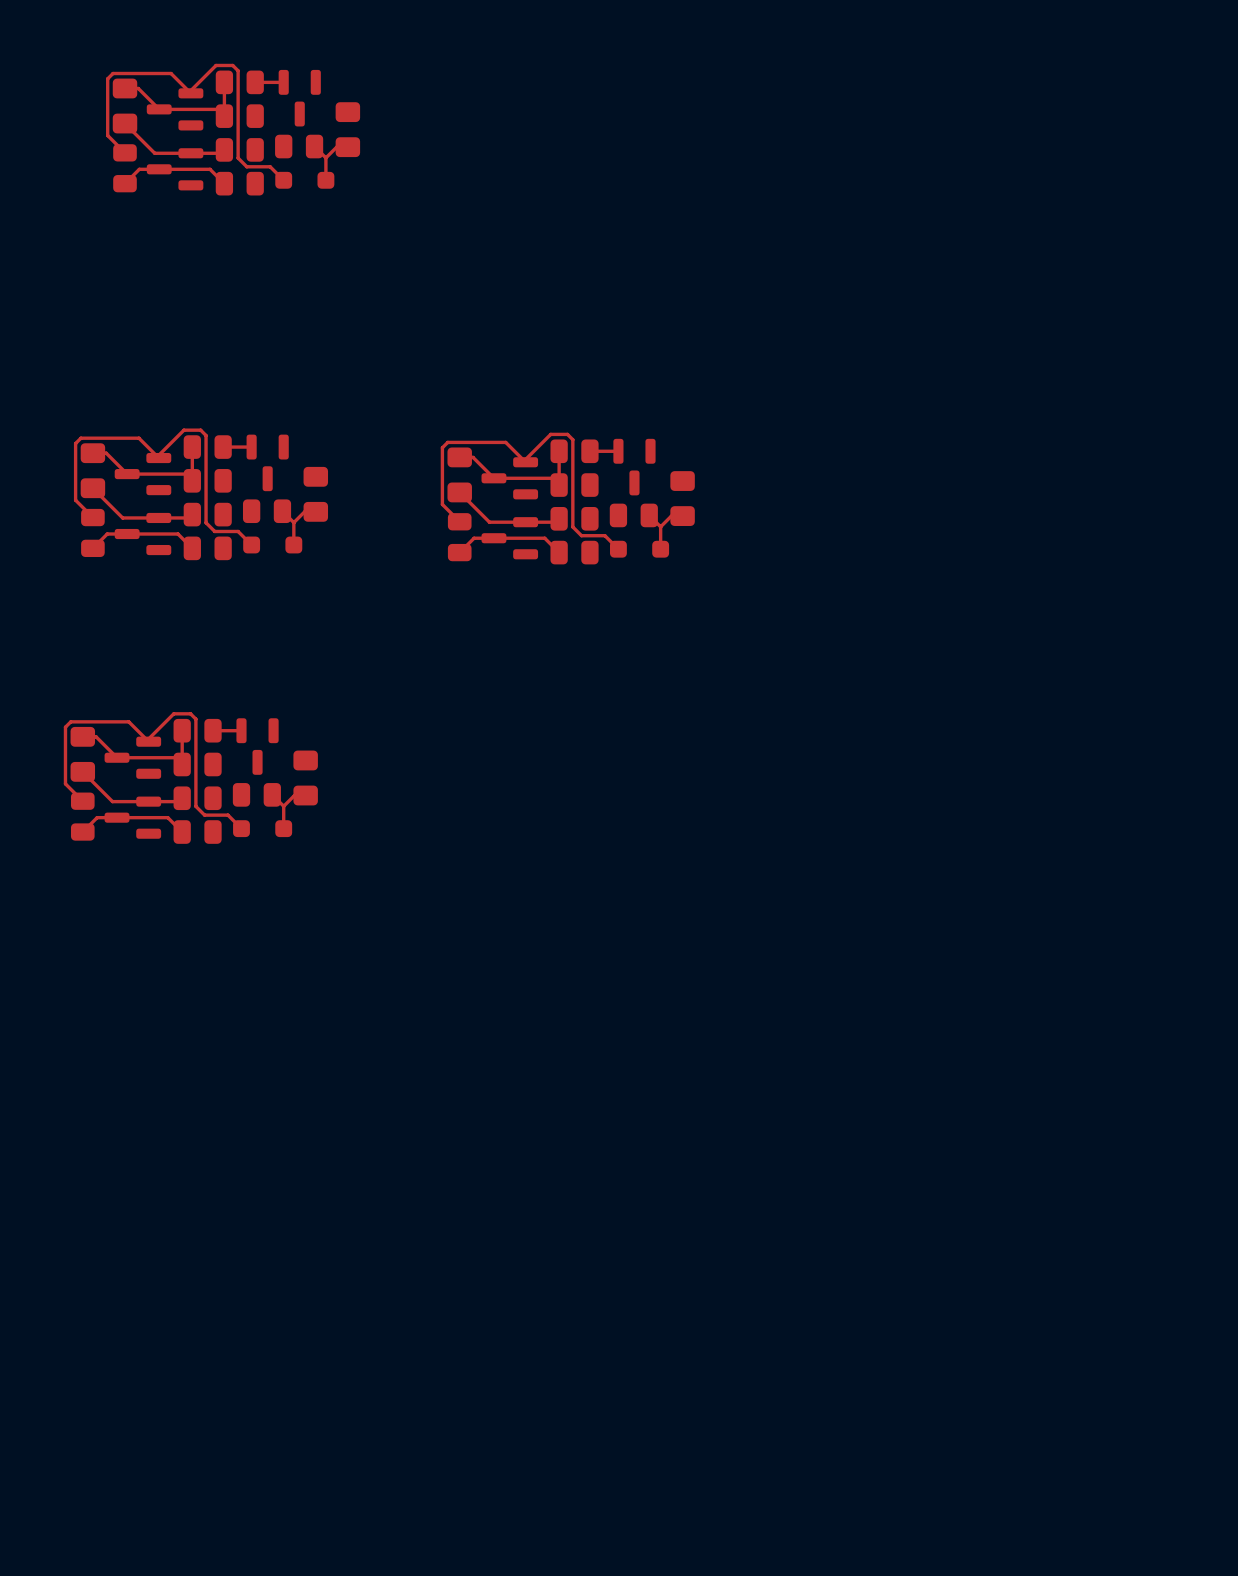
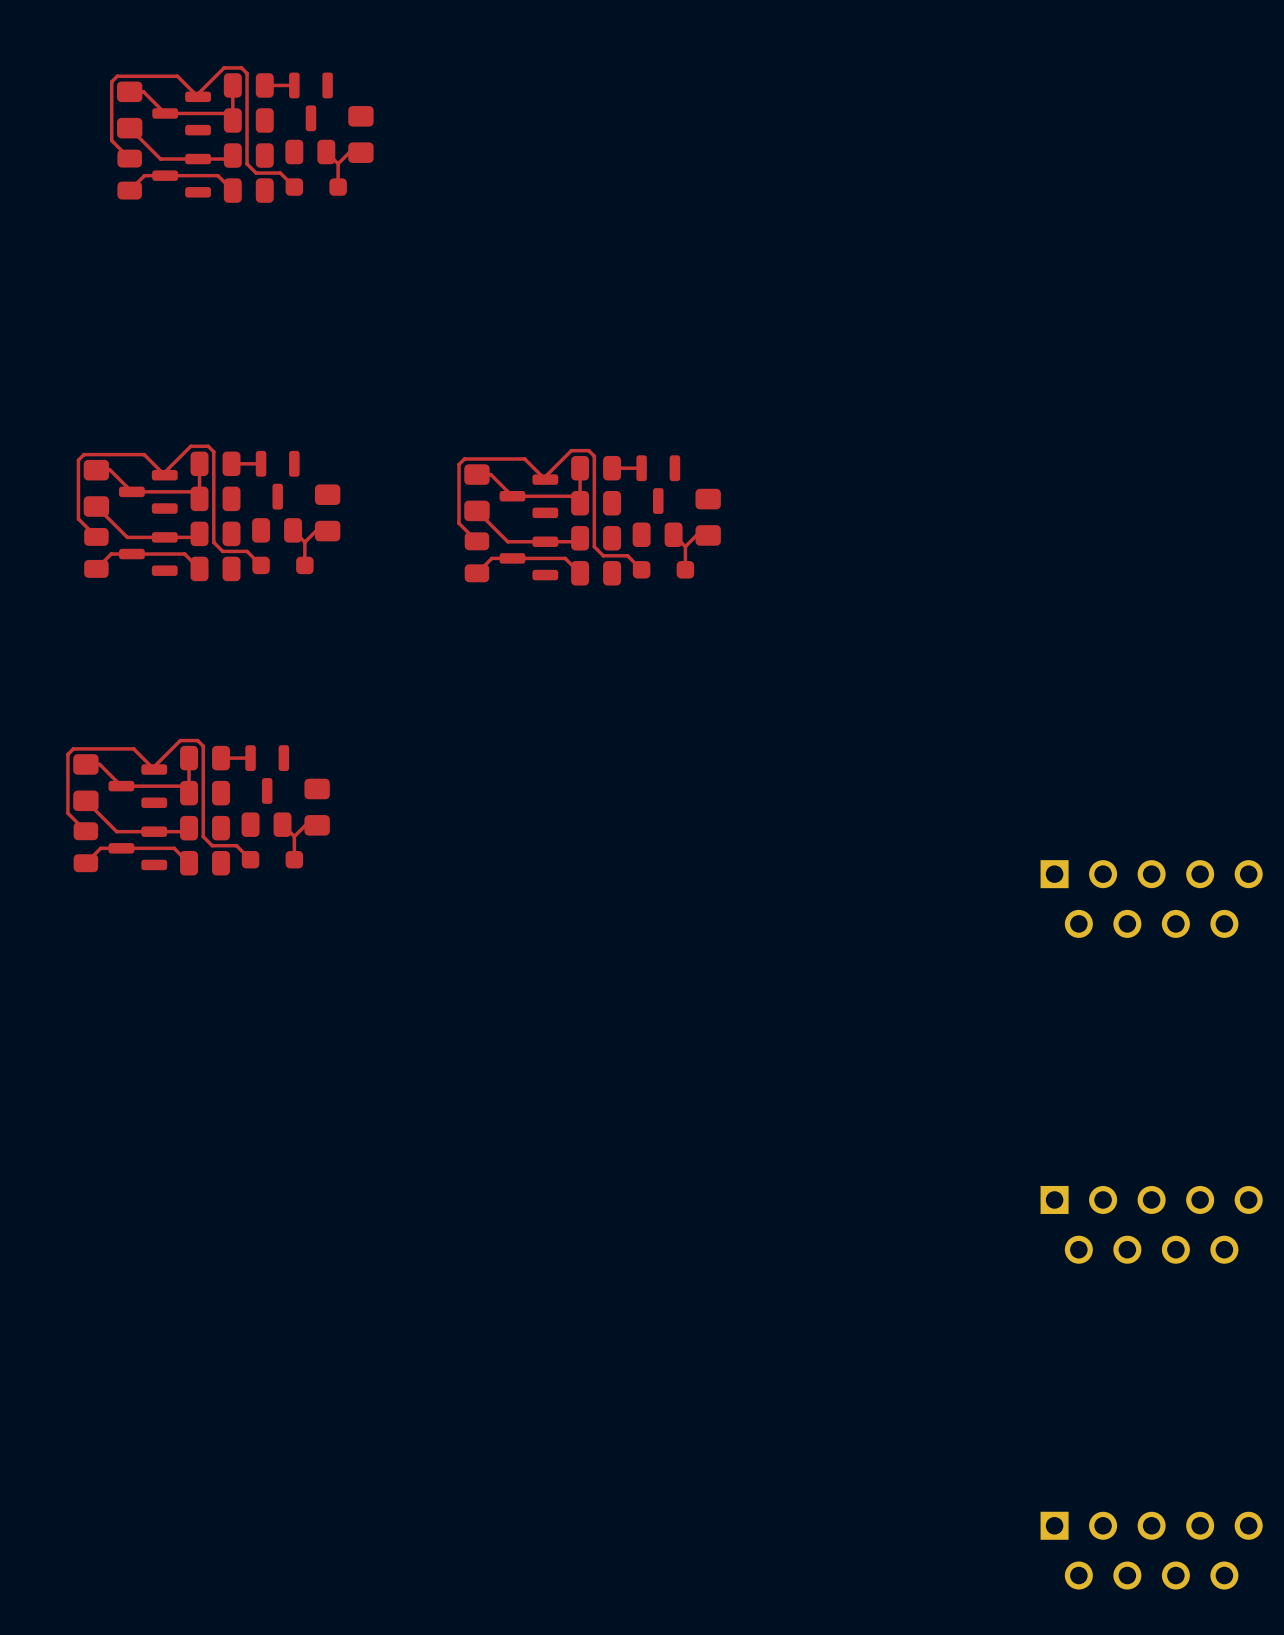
part: none -> (1151, 899)
part: none -> (1151, 1224)
part: none -> (1151, 1550)

